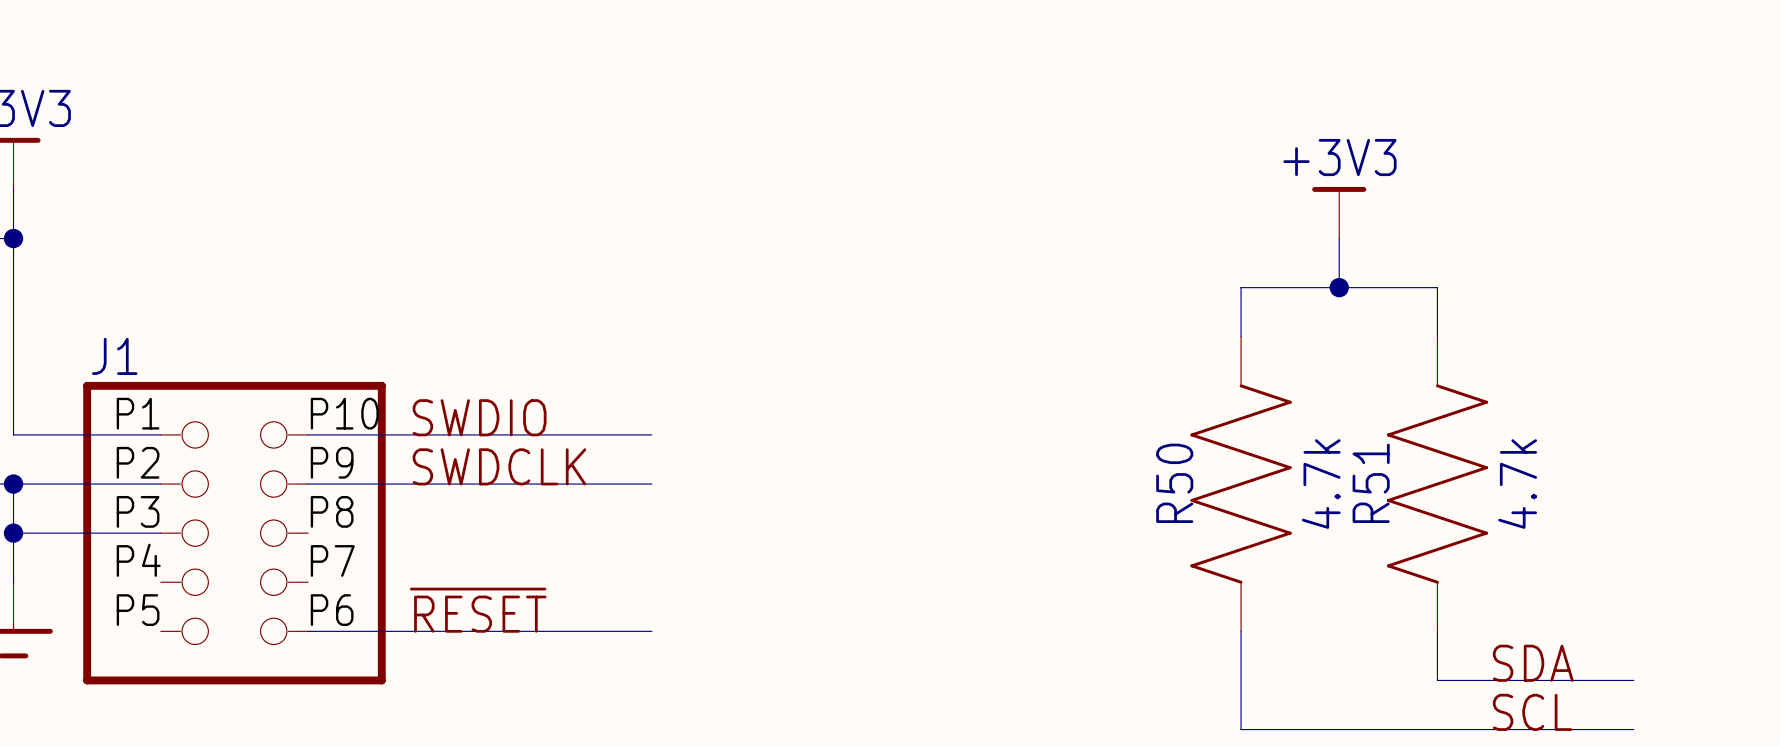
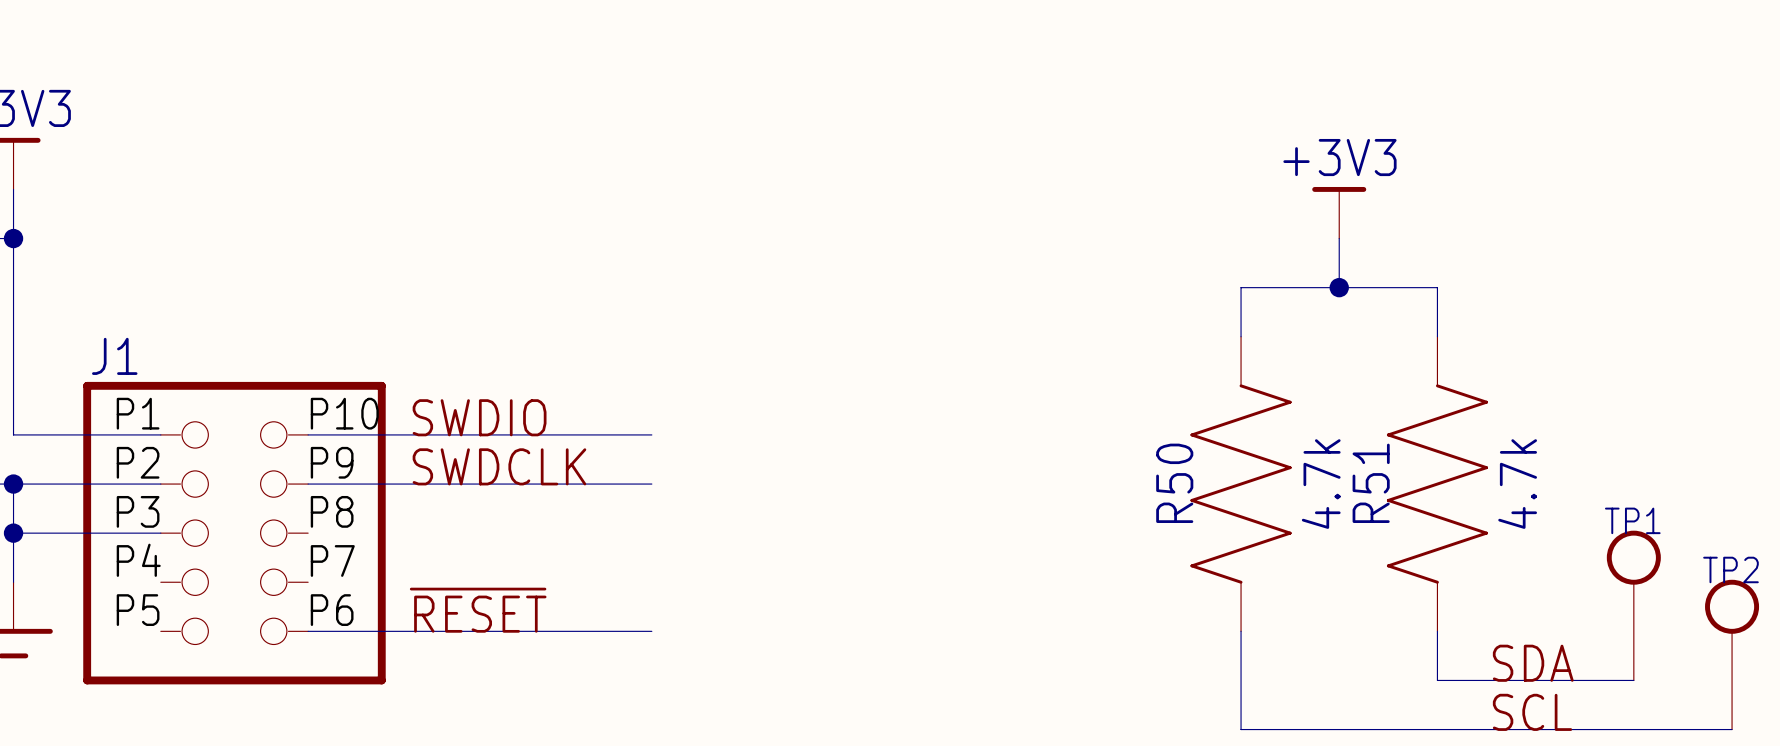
TP1: none -> (1633, 605)
TP2: none -> (1732, 654)
wire: none -> (1633, 729) (1732, 729)

